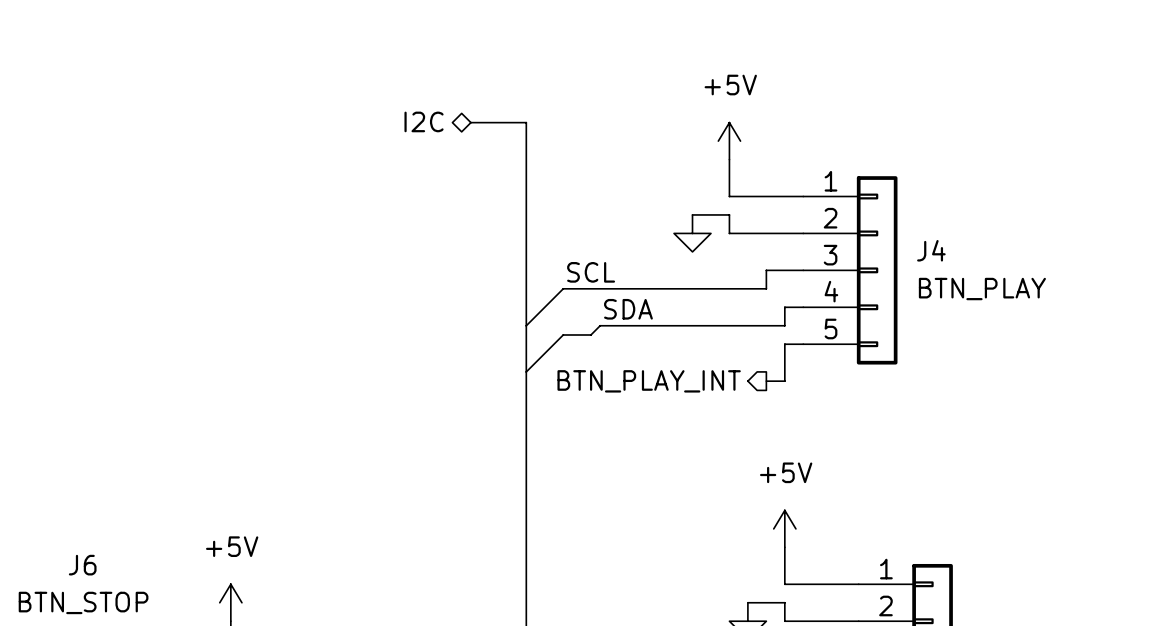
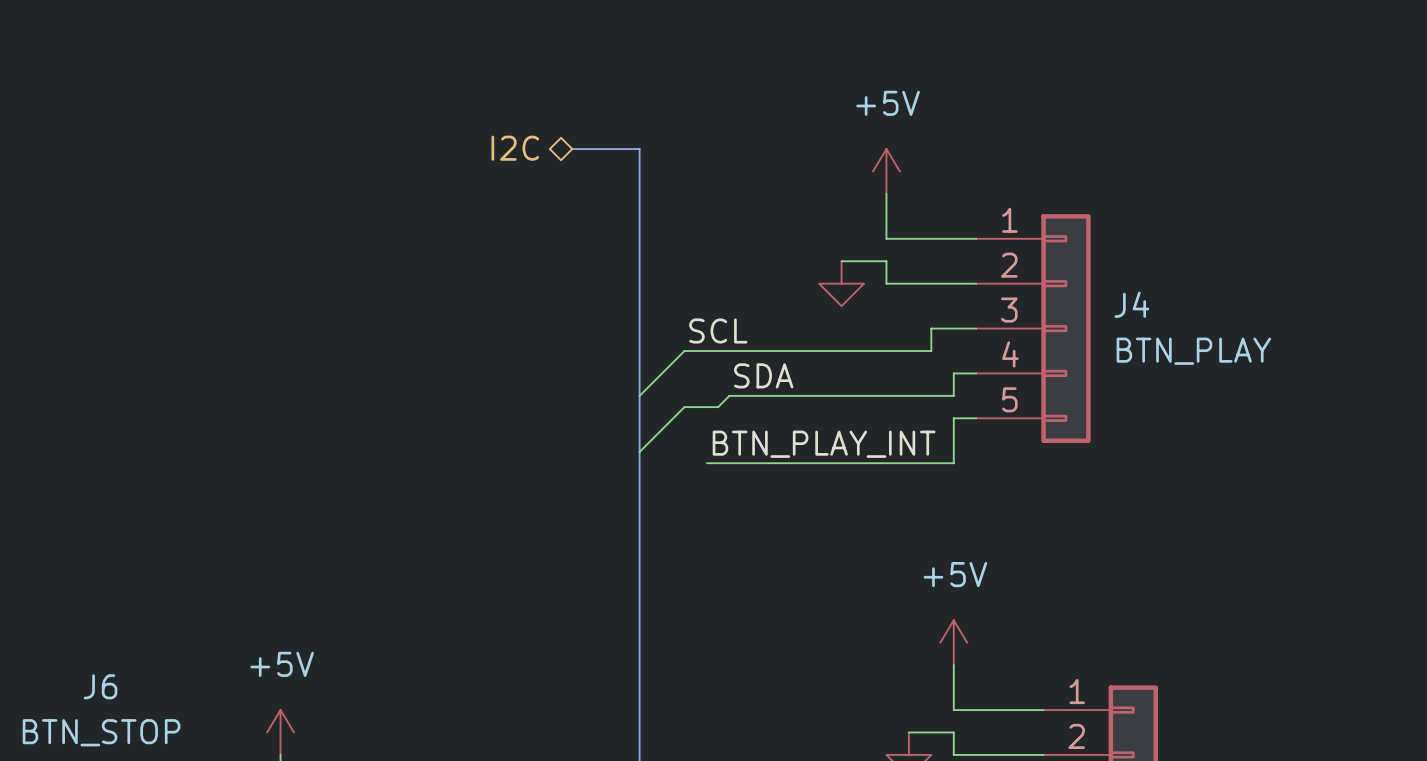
label: none -> BTN_PLAY_INT (824, 444)
wire: none -> (706, 463) (931, 463)
hierarchical label: BTN_PLAY_INT (649, 381) -> none

